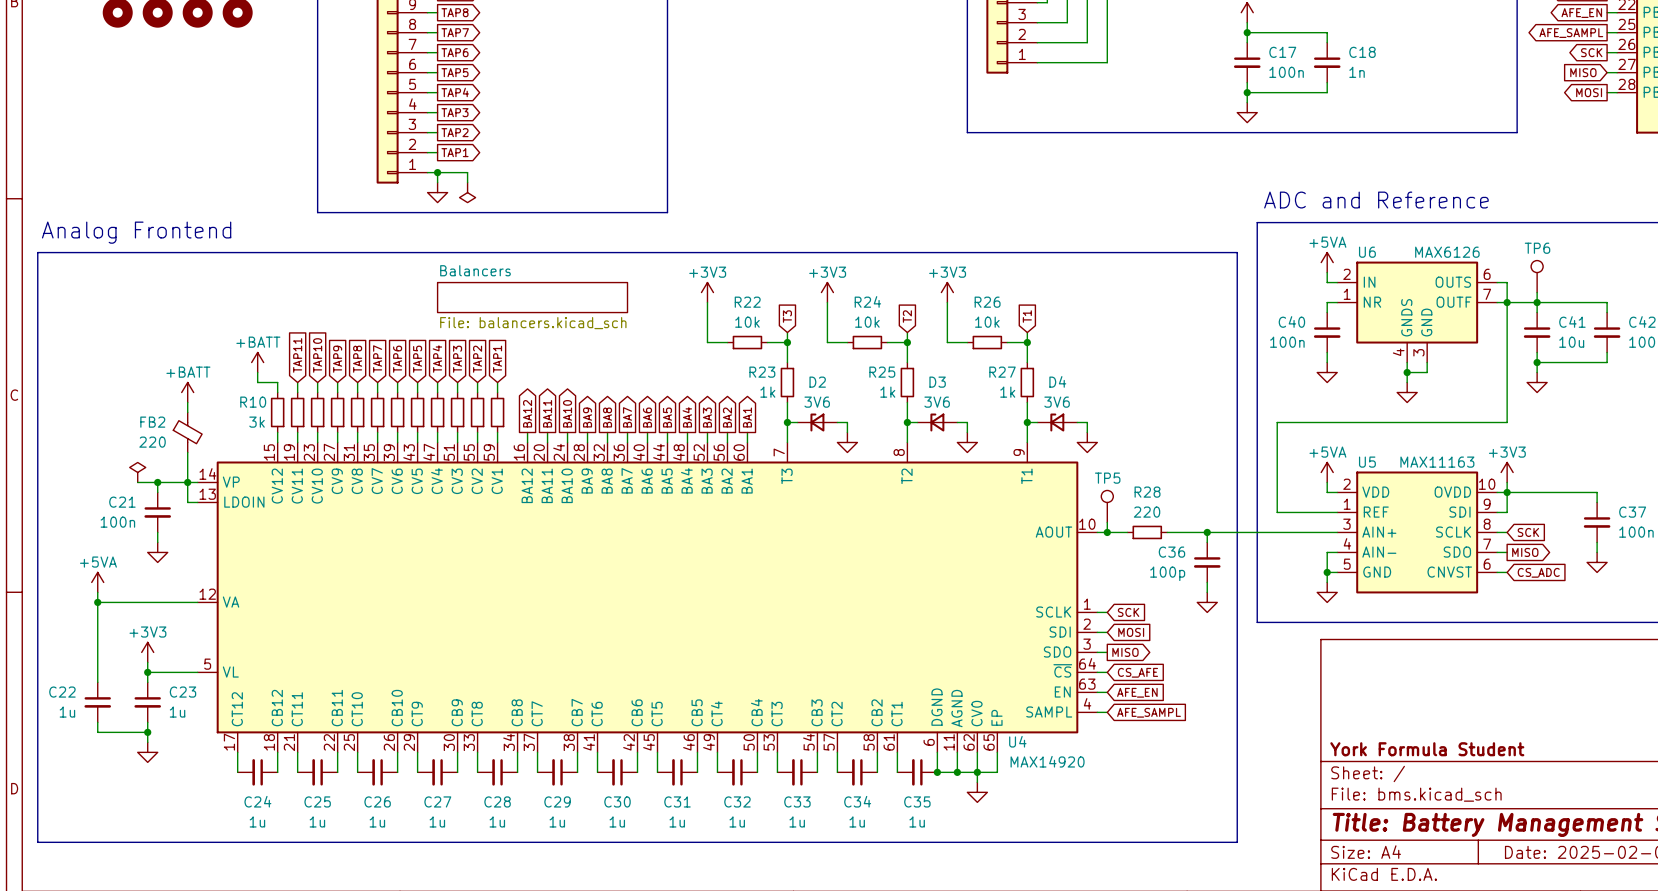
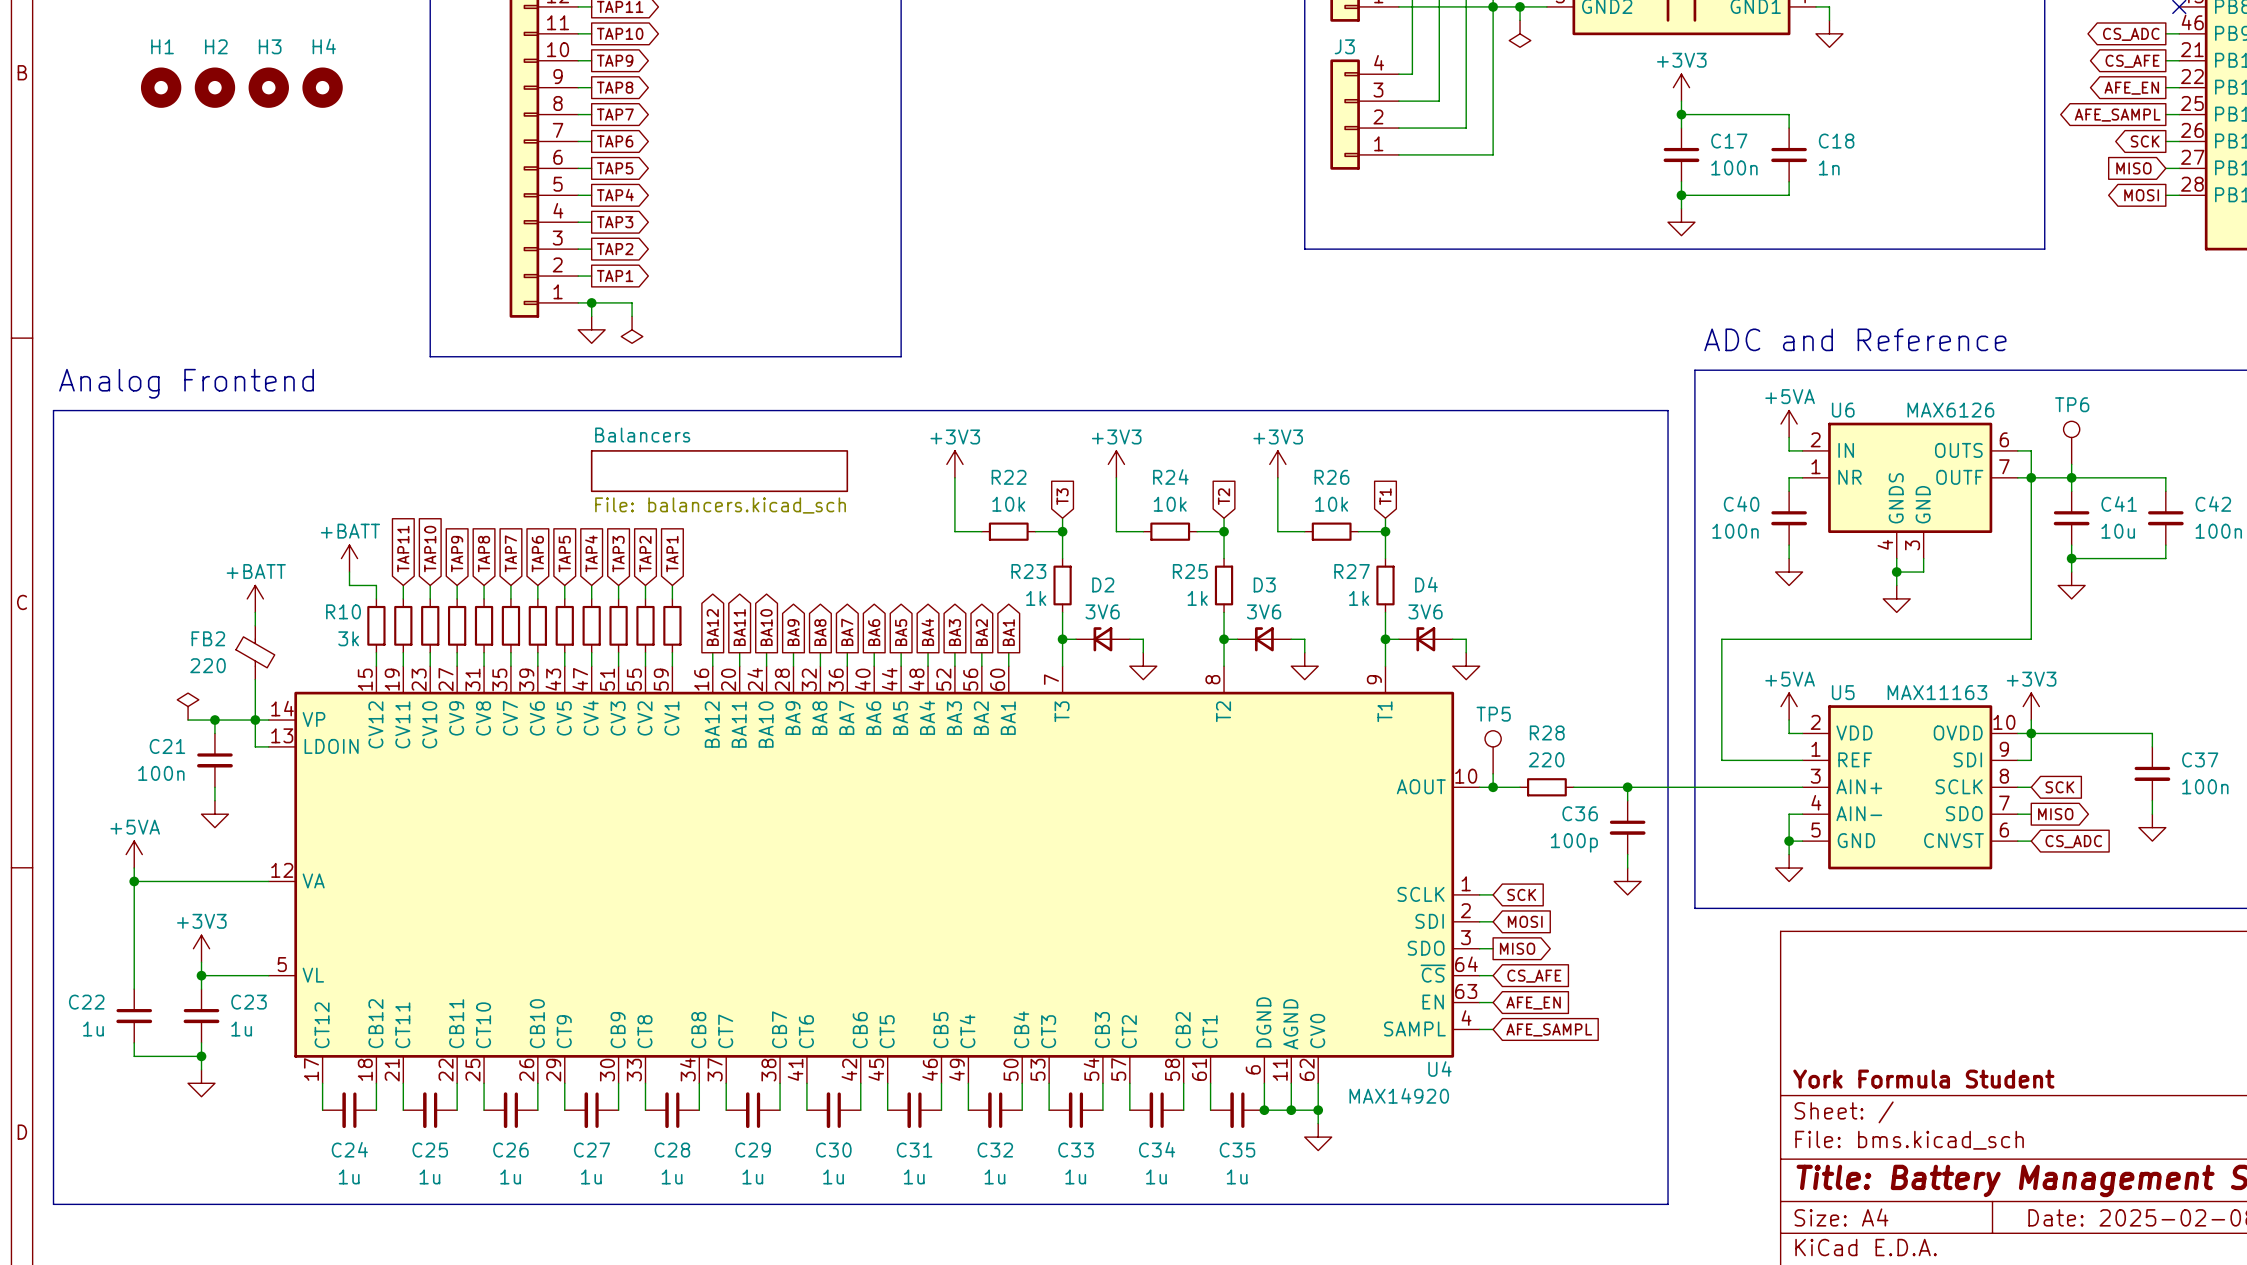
U4 symbol: [197, 442, 1098, 753] -> [268, 666, 1480, 1084]
U4 name position: U4 (1017, 741) -> U4 (1439, 1069)
wire: (997, 752) (997, 772) (977, 772) -> none

